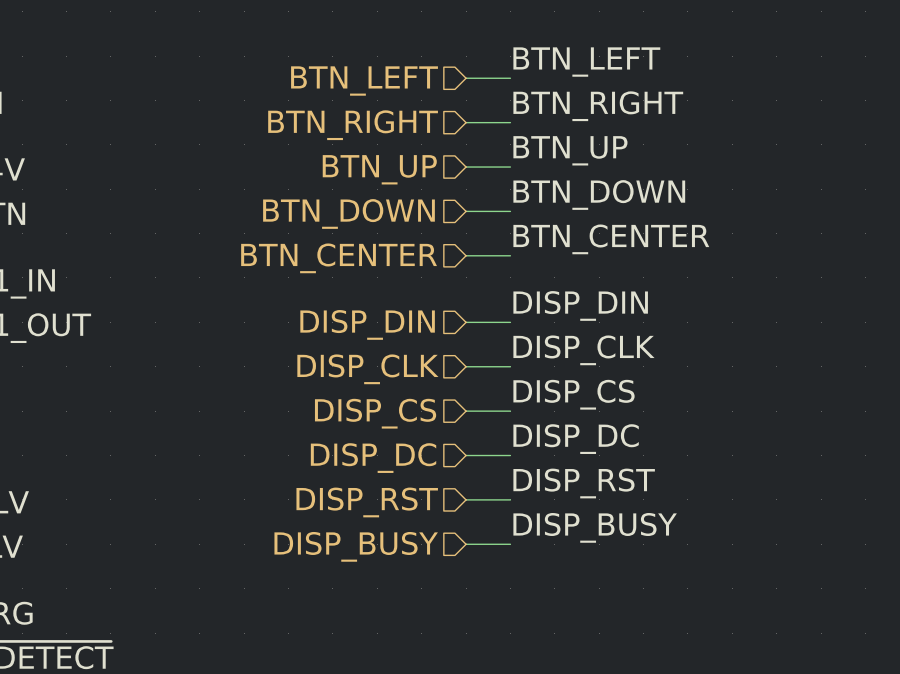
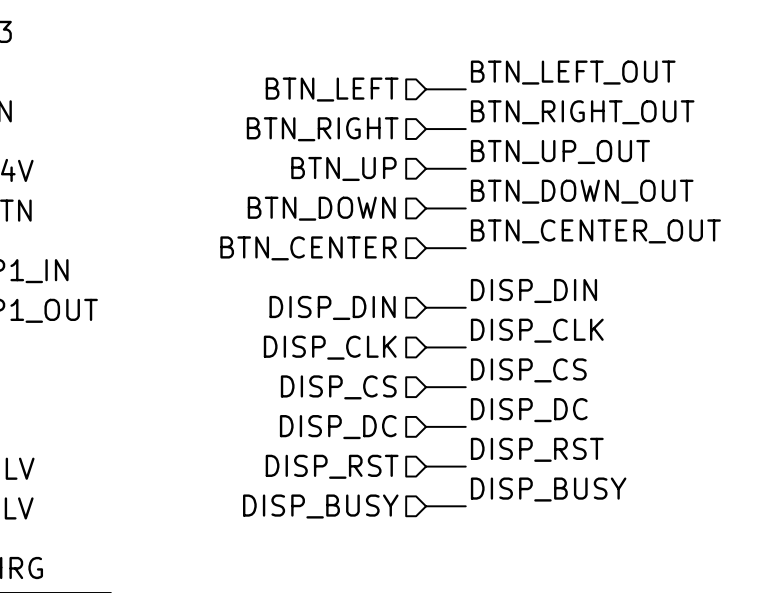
label: BTN_LEFT (586, 62) -> BTN_LEFT_OUT (573, 72)
label: BTN_RIGHT (598, 106) -> BTN_RIGHT_OUT (582, 112)
label: BTN_UP (570, 150) -> BTN_UP_OUT (560, 151)
label: BTN_DOWN (599, 194) -> BTN_DOWN_OUT (582, 191)
label: BTN_CENTER (611, 239) -> BTN_CENTER_OUT (595, 231)

